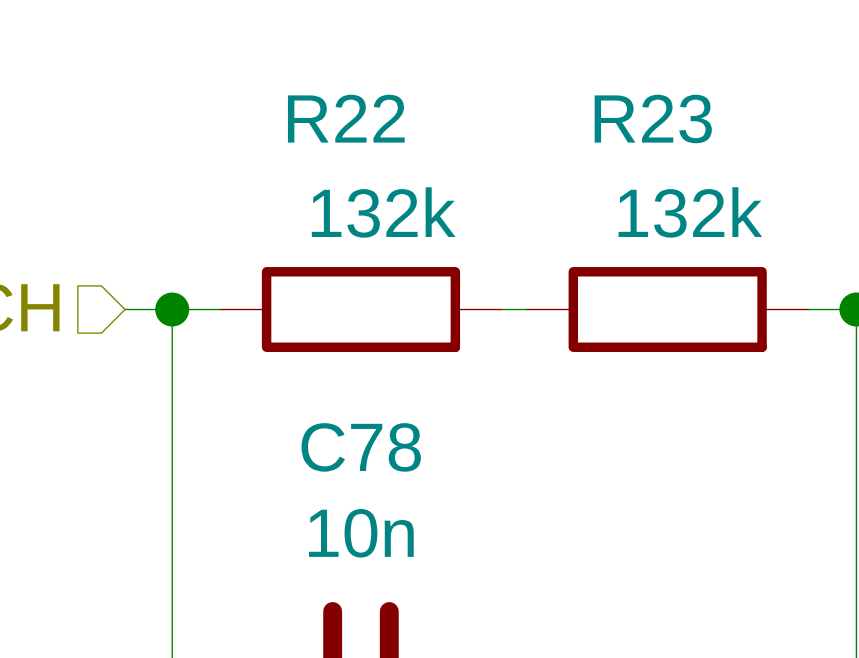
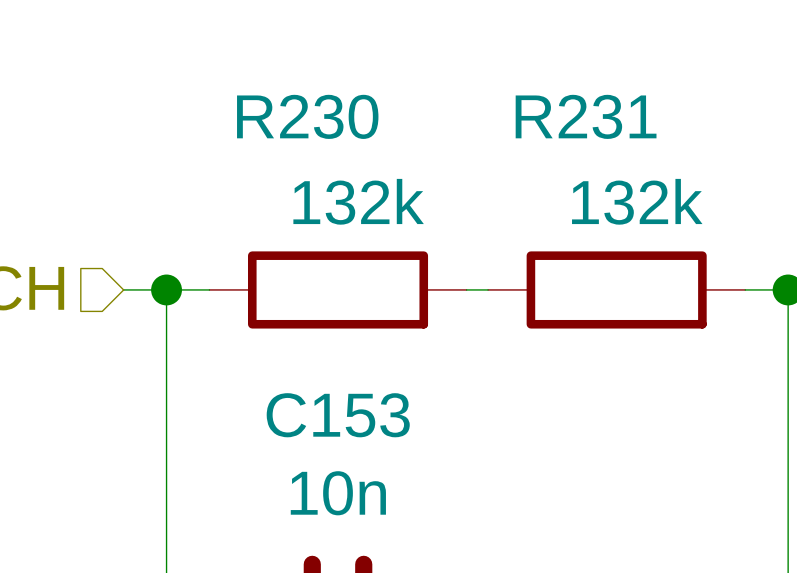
R22 name: R22 (346, 118) -> R230 (307, 116)
R23 name: R23 (653, 118) -> R231 (586, 116)
C78 name: C78 (361, 447) -> C153 (338, 415)

